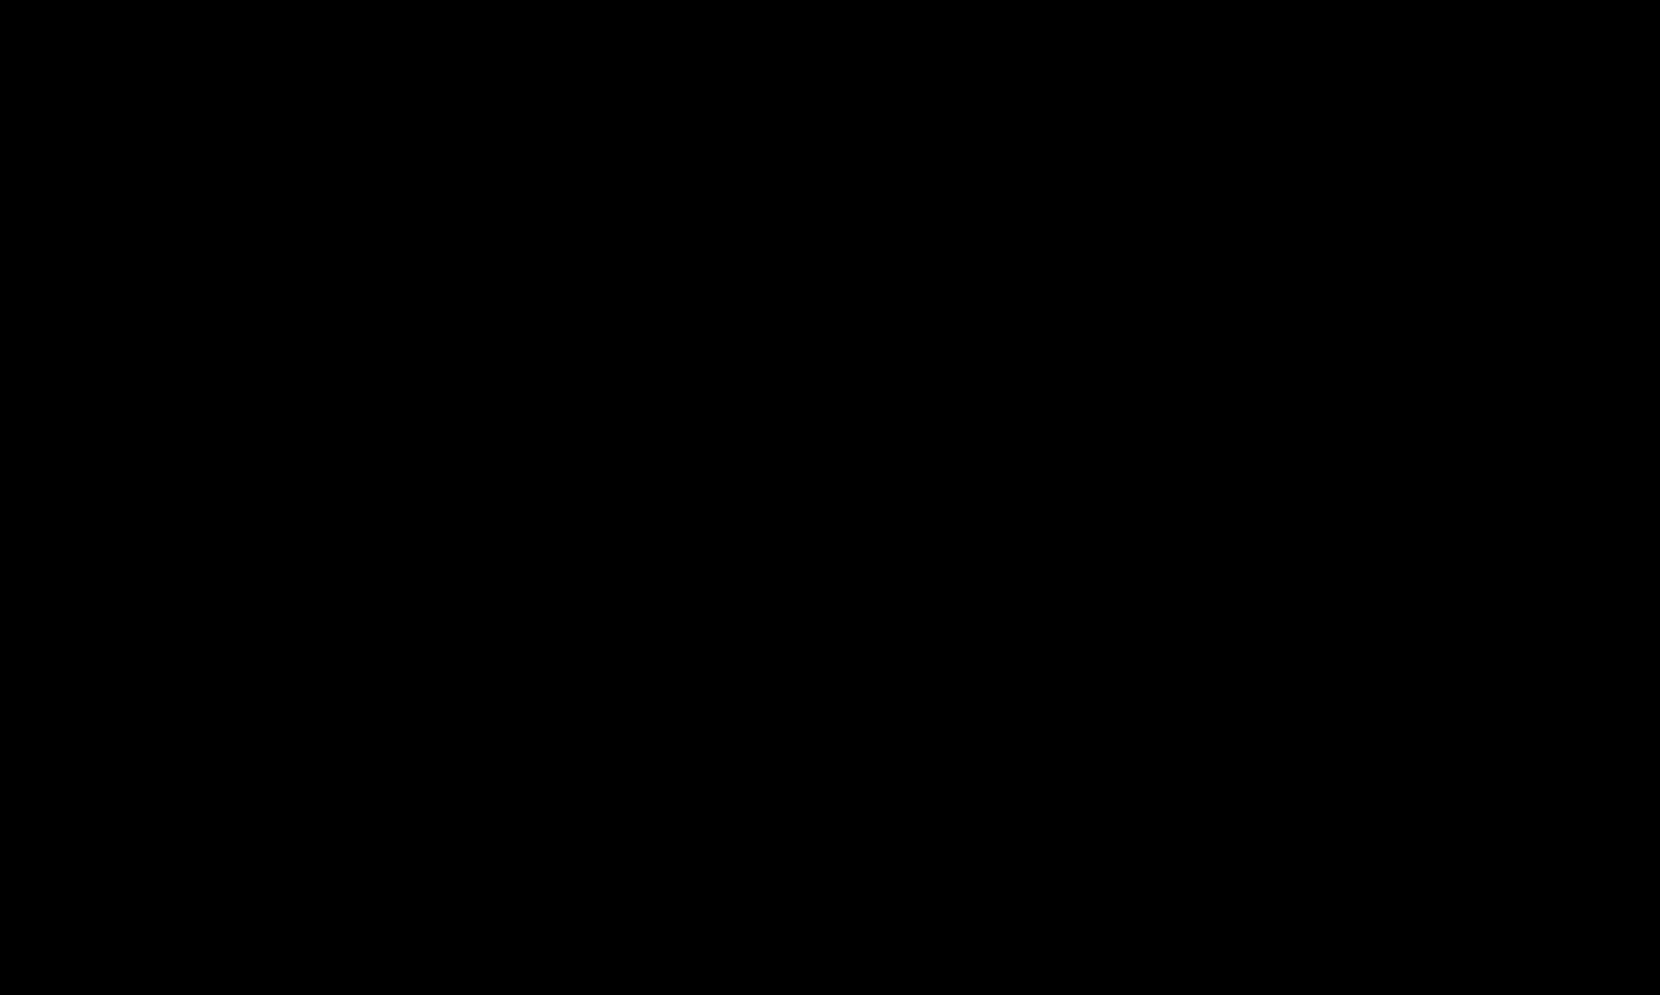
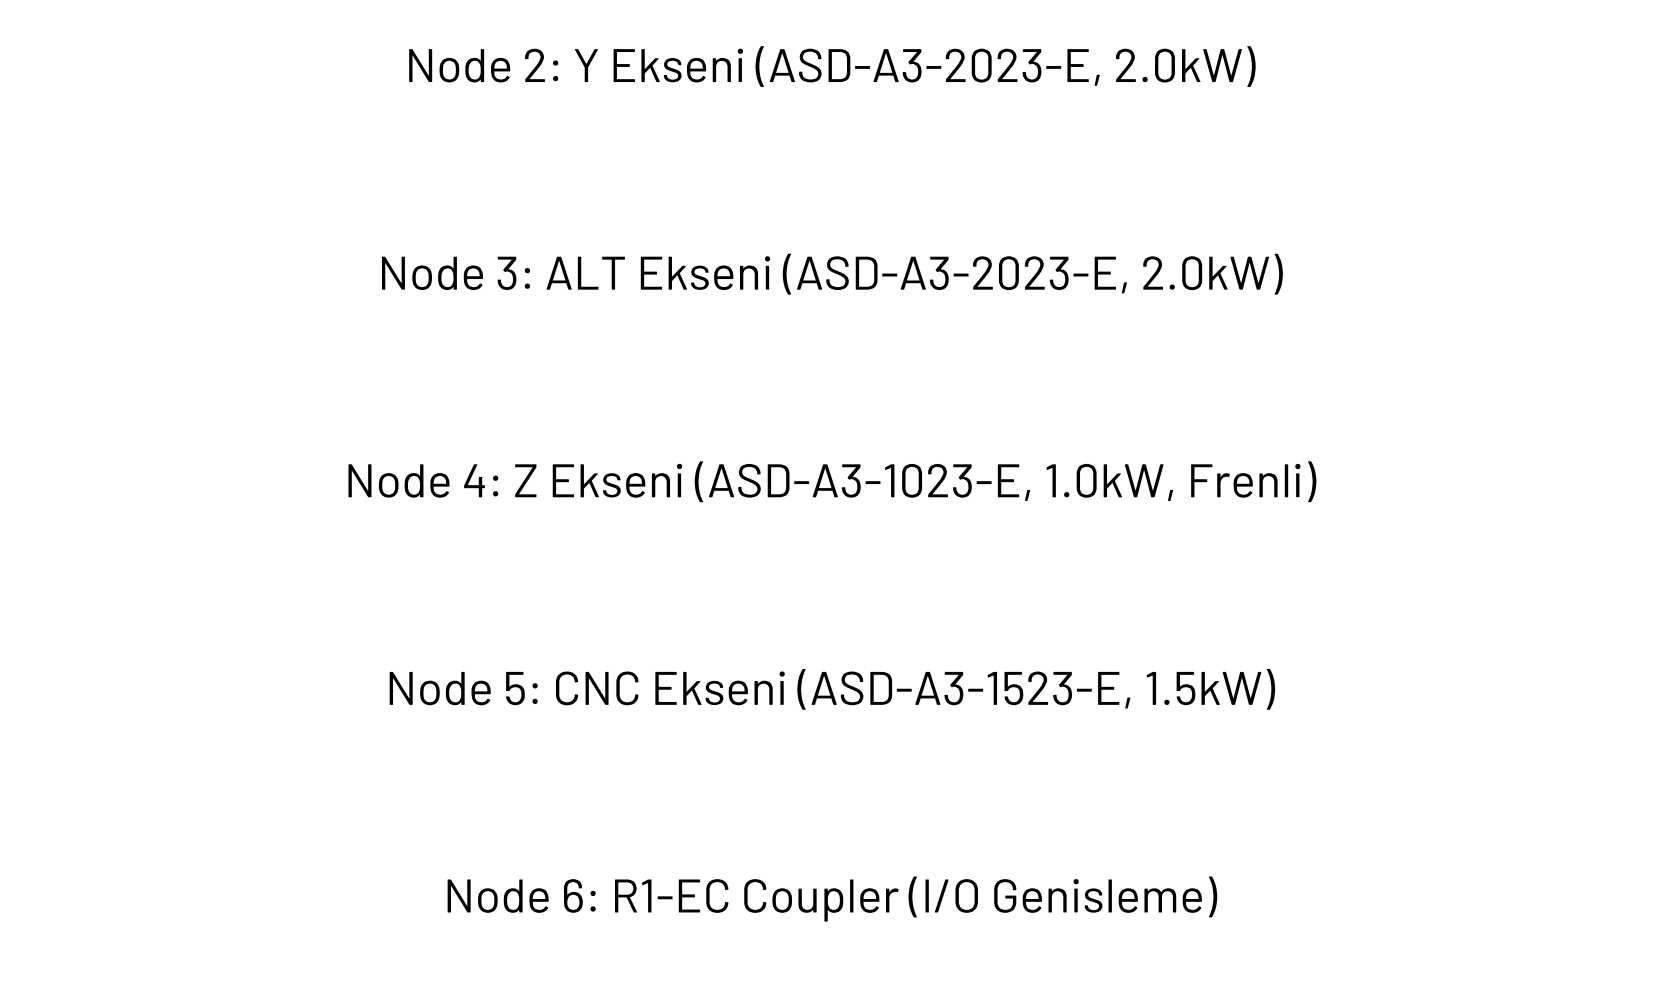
text: none -> Node 2: Y Ekseni (ASD-A3-2023-E, 2.0kW) (832, 66)
text: none -> Node 3: ALT Ekseni (ASD-A3-2023-E, 2.0kW) (832, 274)
text: none -> Node 4: Z Ekseni (ASD-A3-1023-E, 1.0kW, Frenli) (832, 481)
text: none -> Node 5: CNC Ekseni (ASD-A3-1523-E, 1.5kW) (832, 689)
text: none -> Node 6: R1-EC Coupler (I/O Genisleme) (832, 899)

